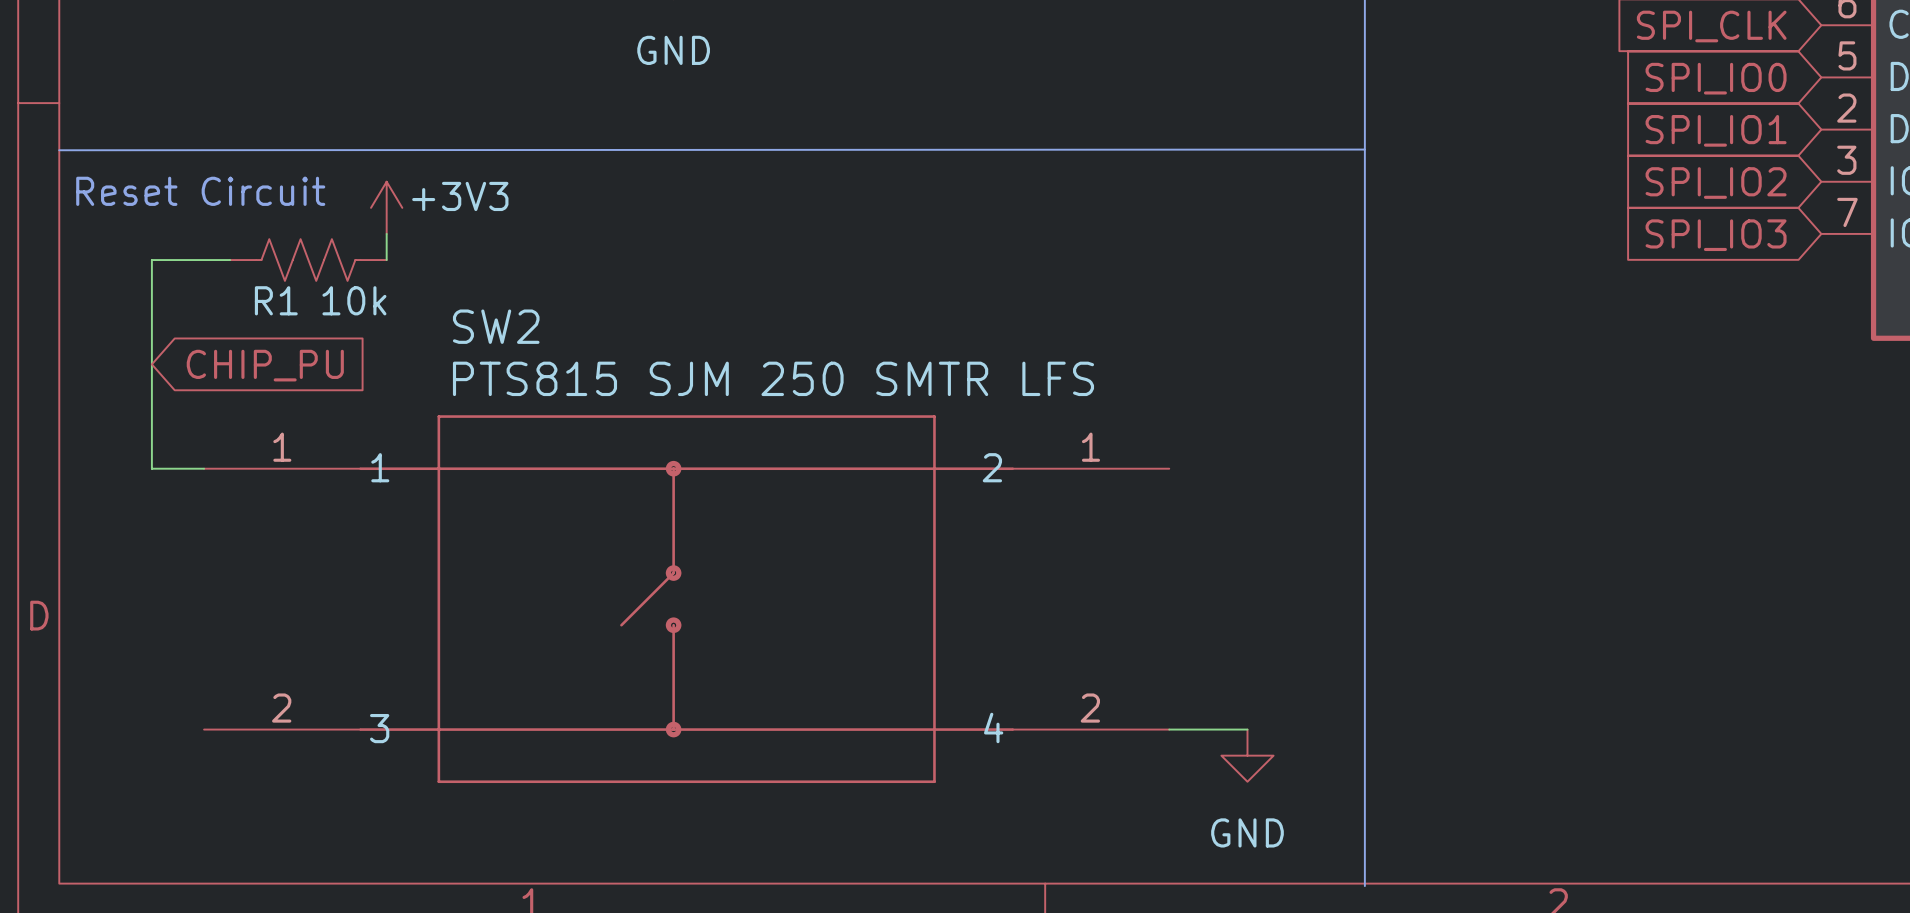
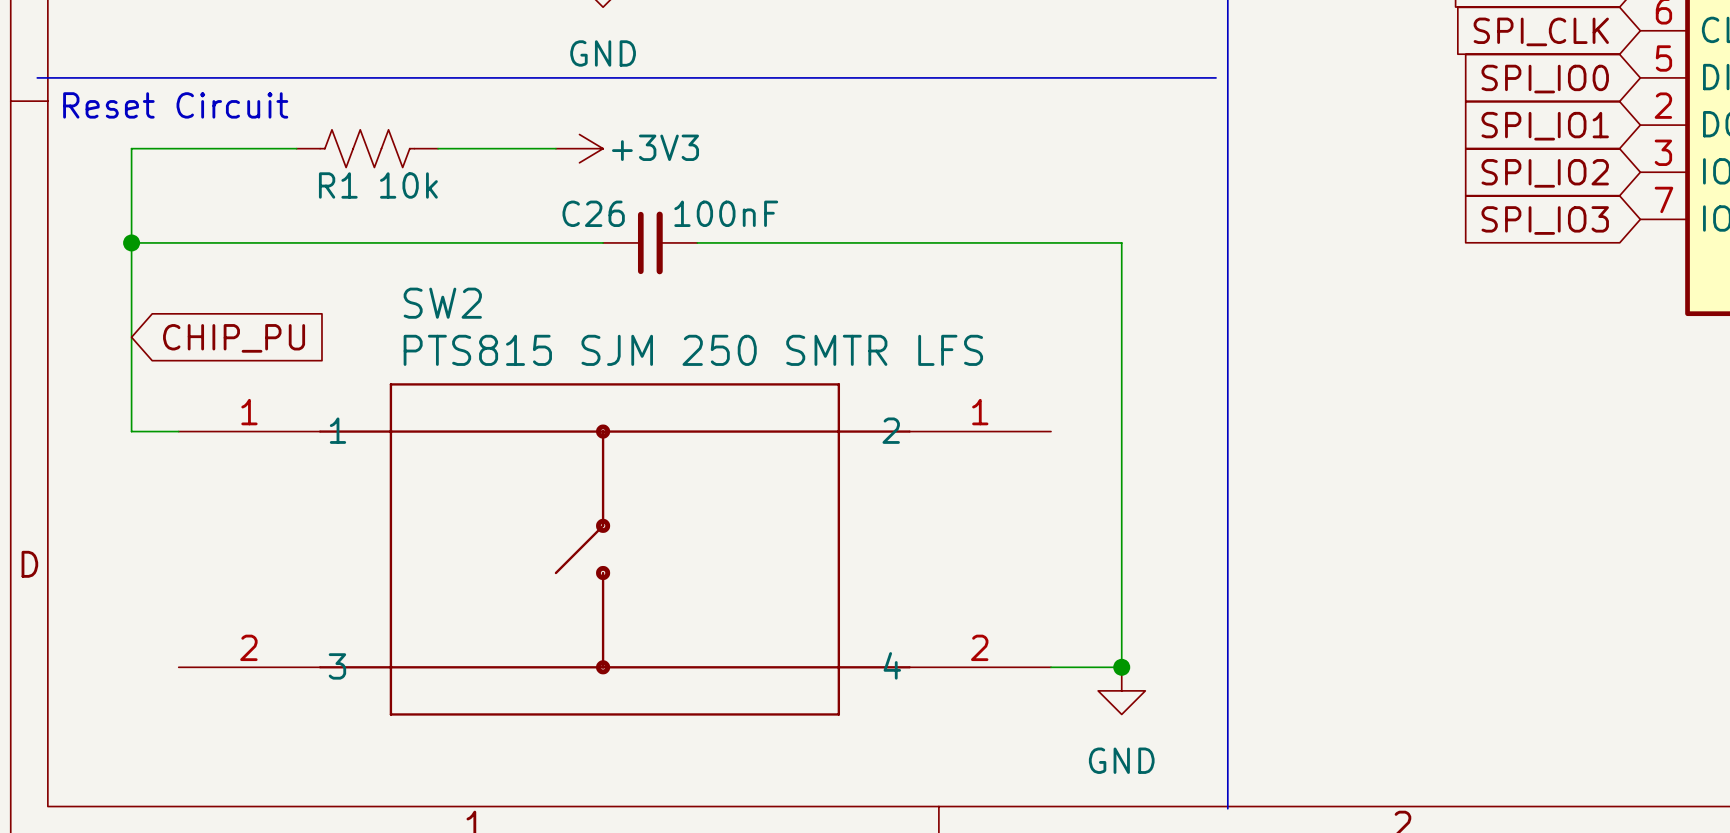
line: none -> (37, 77) (1216, 77)
line: (1364, 149) (59, 150) -> none
wire: none -> (296, 148) (131, 148) (131, 242)
wire: none -> (438, 148) (555, 148)
text position: Reset Circuit (200, 191) -> Reset Circuit (175, 105)
power symbol rotation: 0° (386, 207) -> 90° clockwise (579, 148)
power symbol position: +3V3 (386, 207) -> +3V3 (579, 148)
wire: (386, 233) (386, 260) -> none
junction: none -> (131, 242)
wire: none -> (202, 242) (603, 242)
R1 position: (308, 260) -> (367, 148)
C26: none -> 100nF (650, 242)
wire: none -> (697, 242) (1121, 242) (1121, 667)
junction: none -> (1121, 667)

